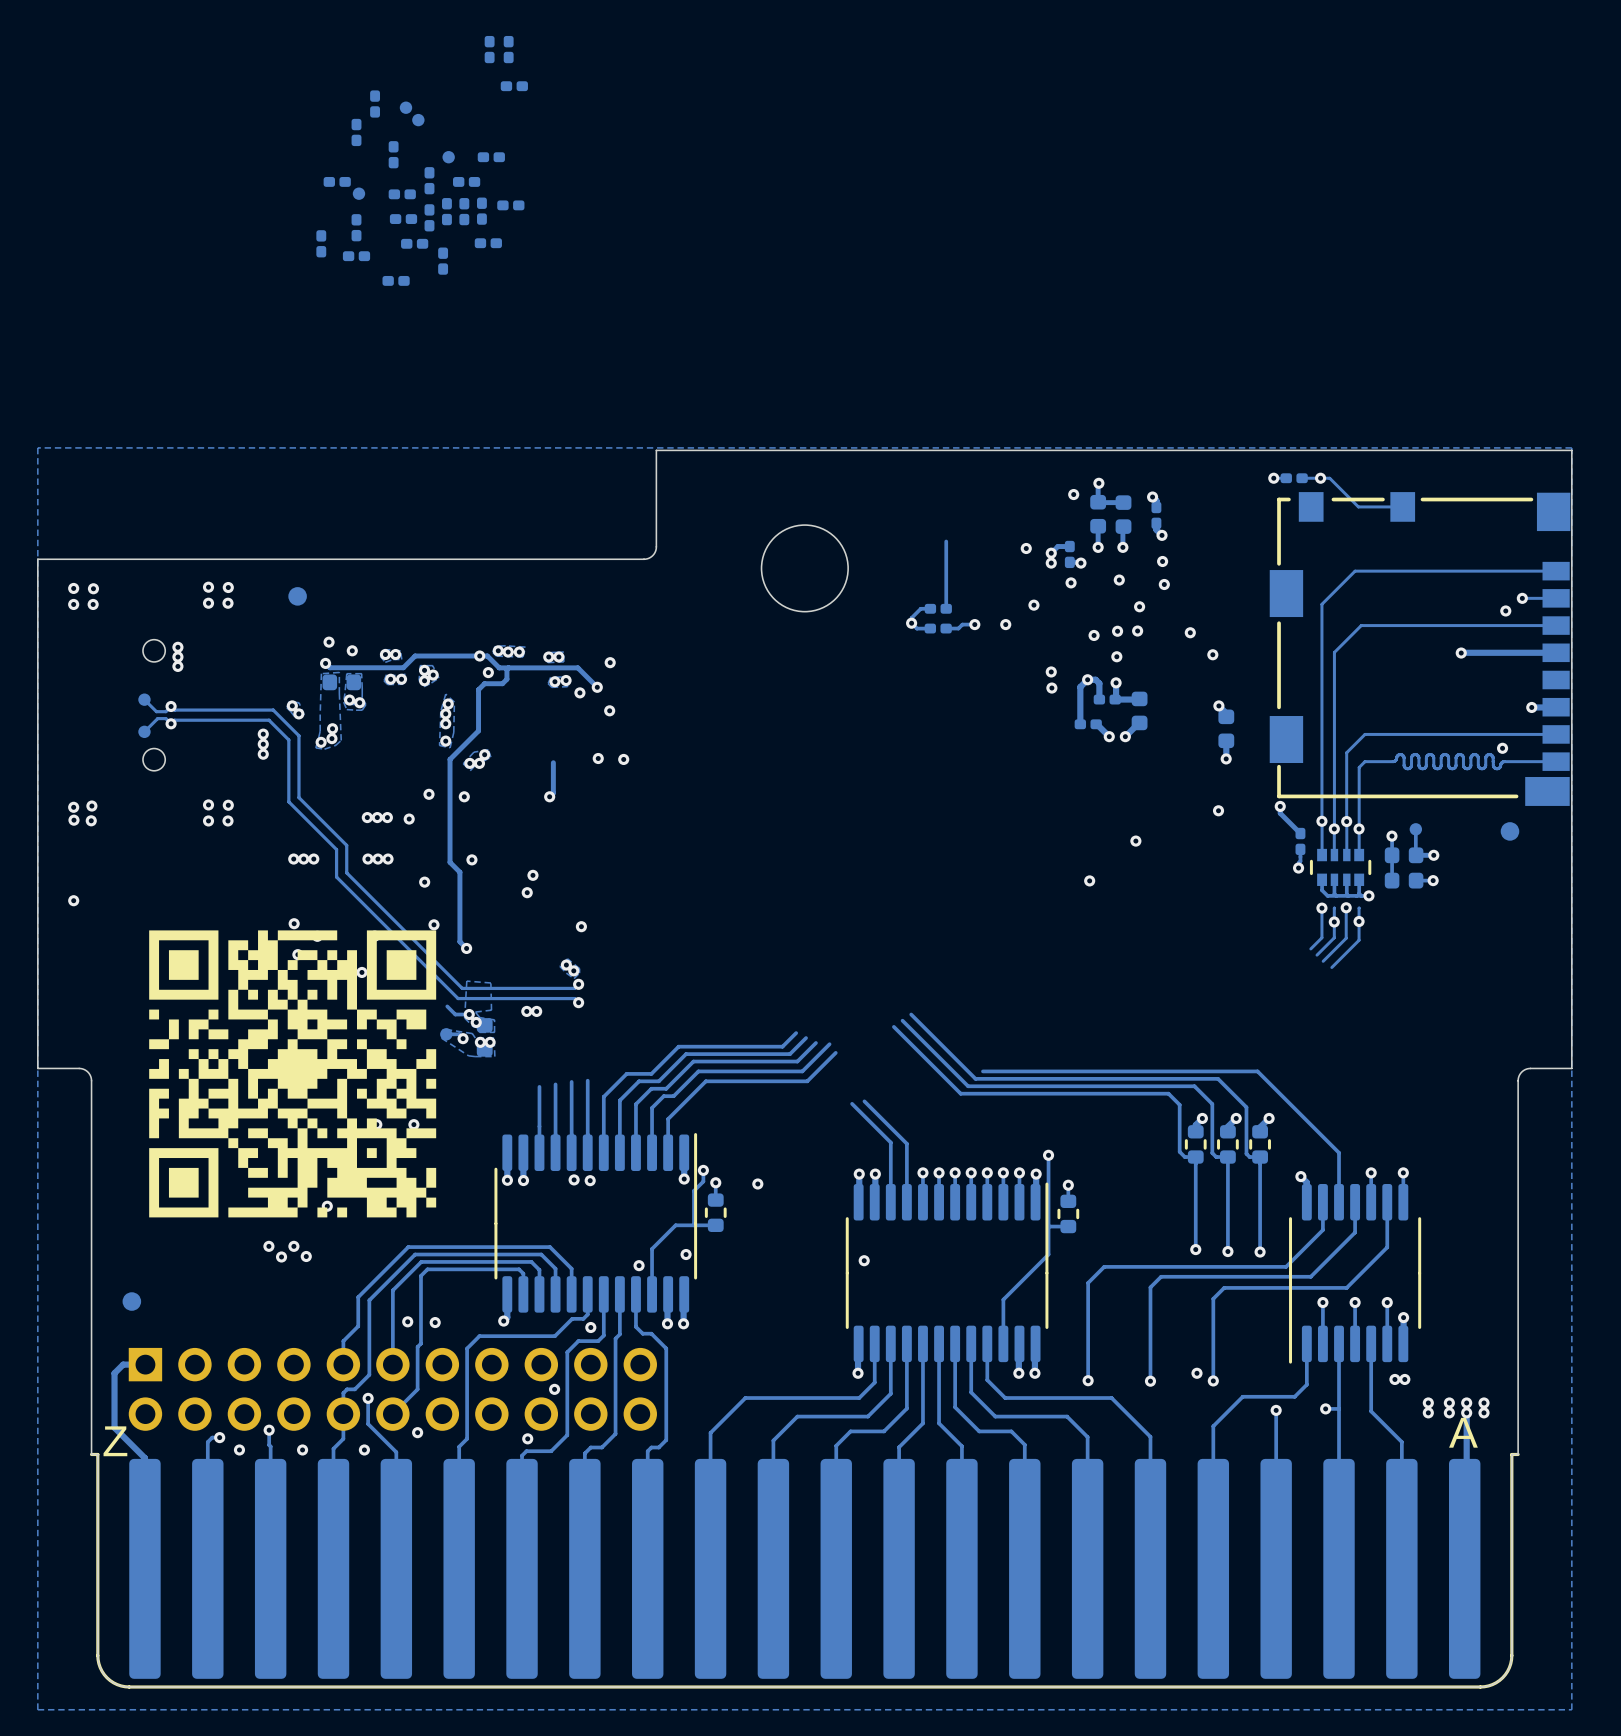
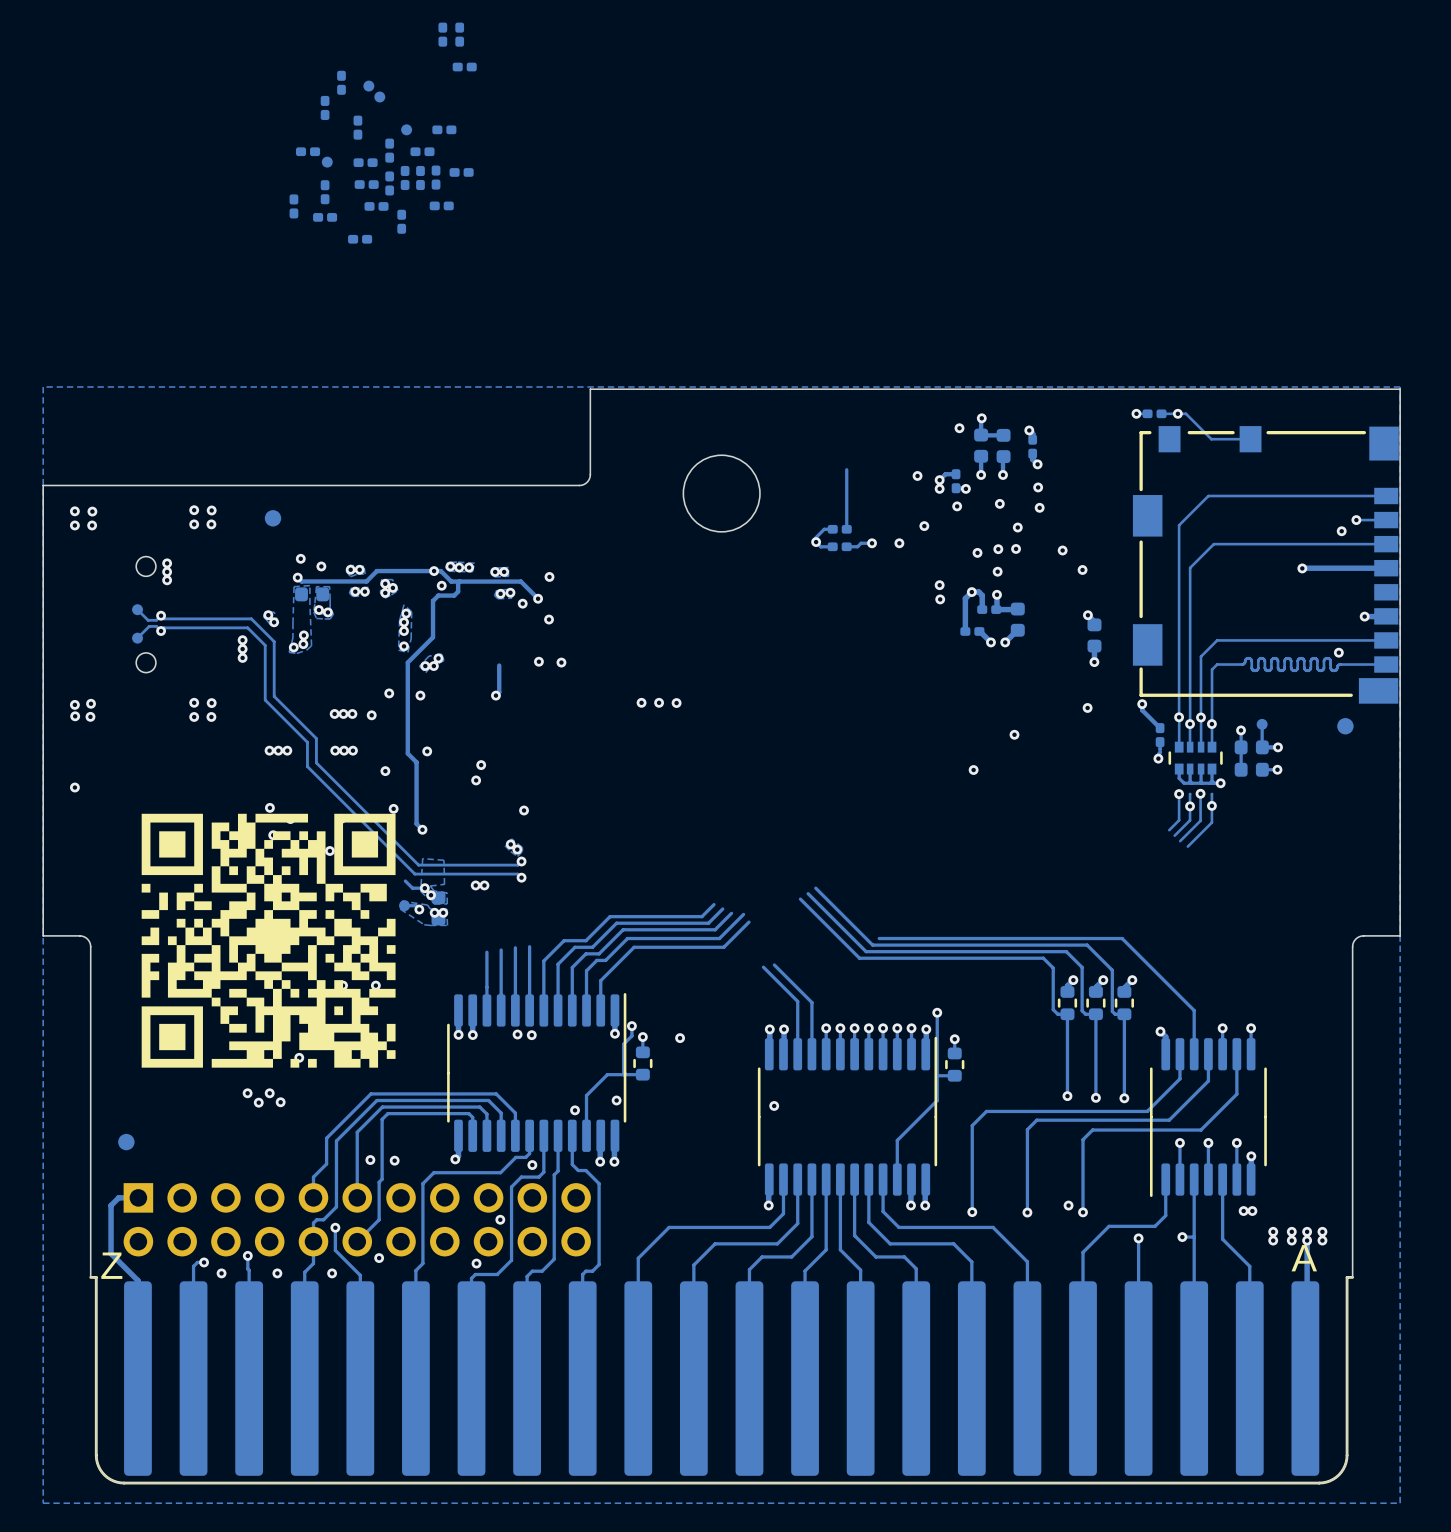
via: none -> (641, 702)
via: none -> (659, 702)
via: none -> (676, 703)

